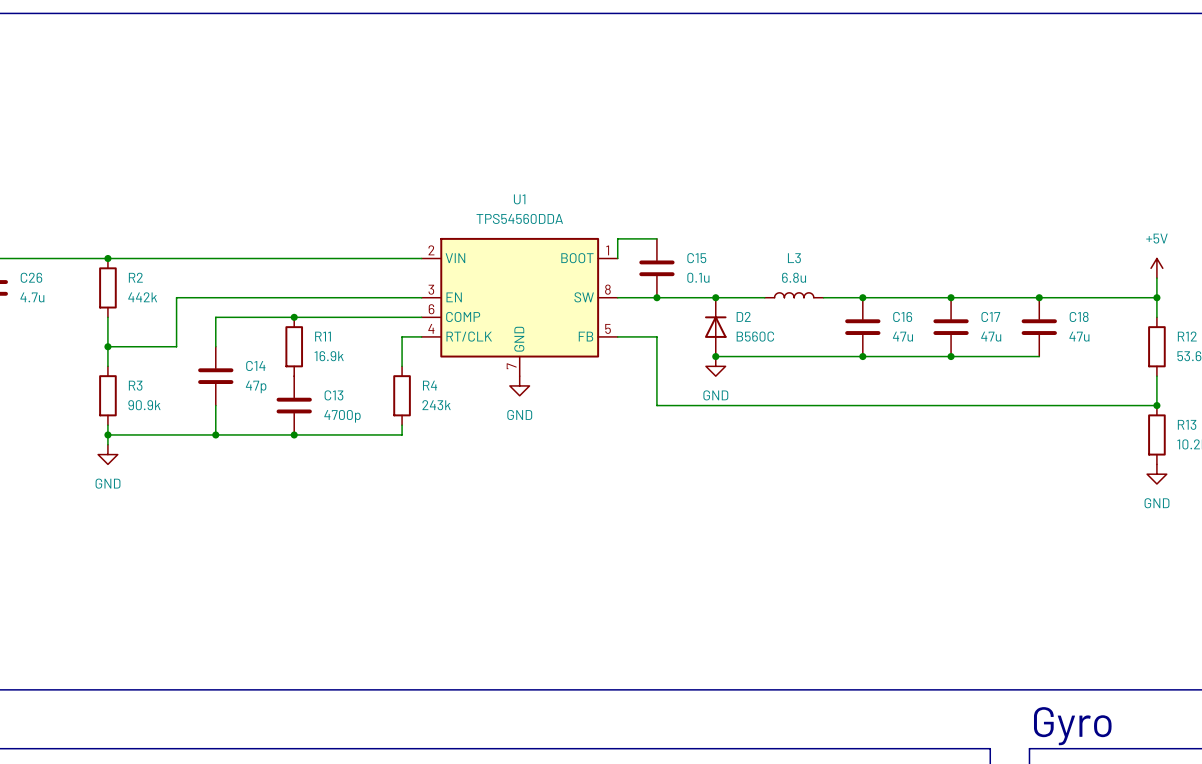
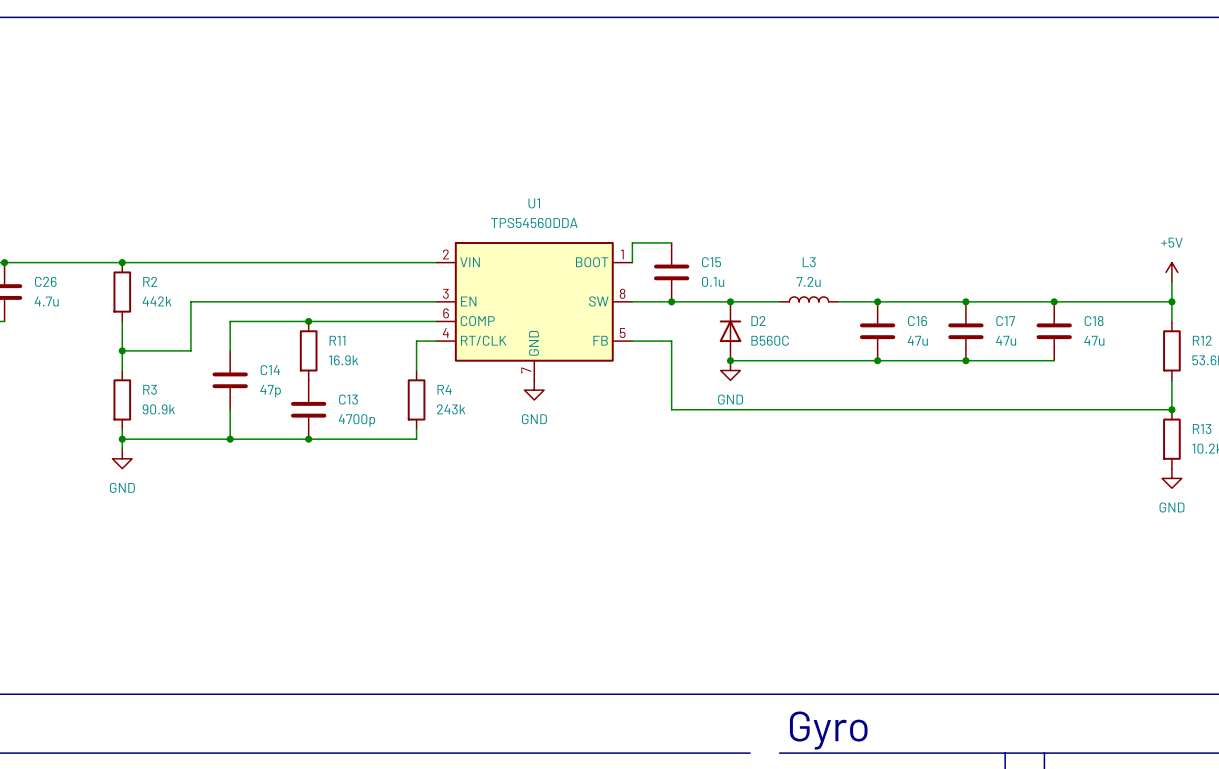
L3 value: 6.8u (794, 277) -> 7.2u (808, 281)
text: none -> Gyro (828, 730)
text: Gyro (1072, 726) -> none
line: (735, 748) (764, 748) -> none
line: none -> (1005, 753) (1044, 753)

